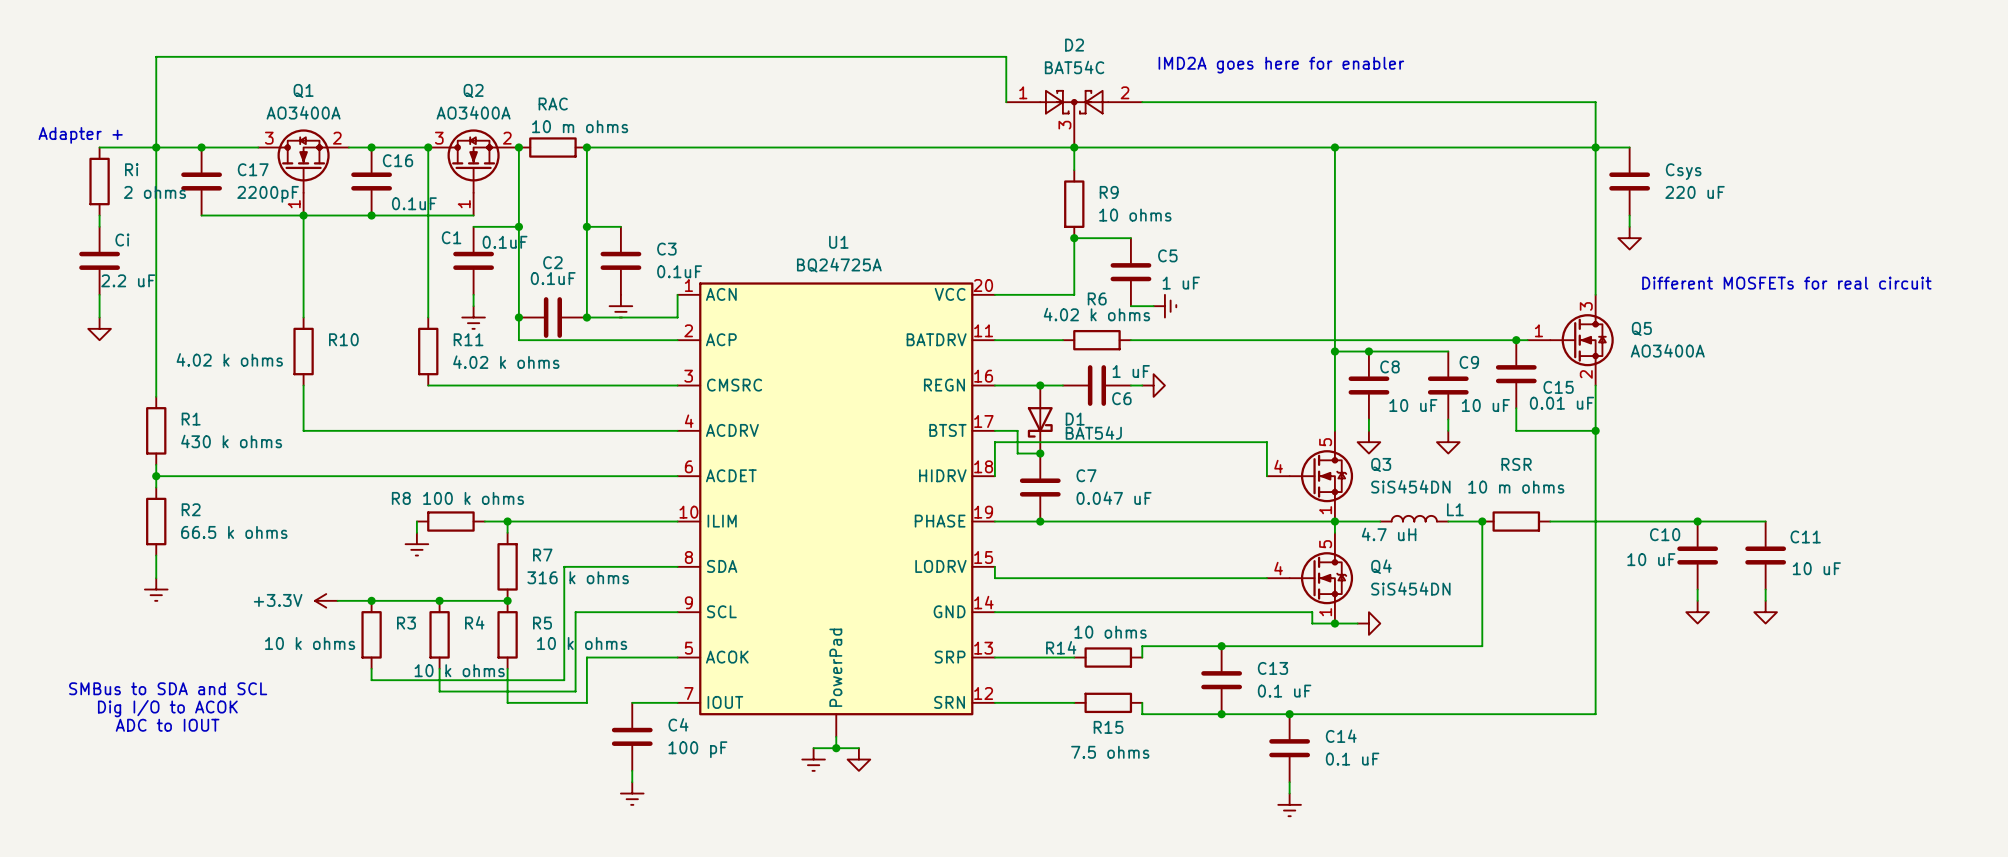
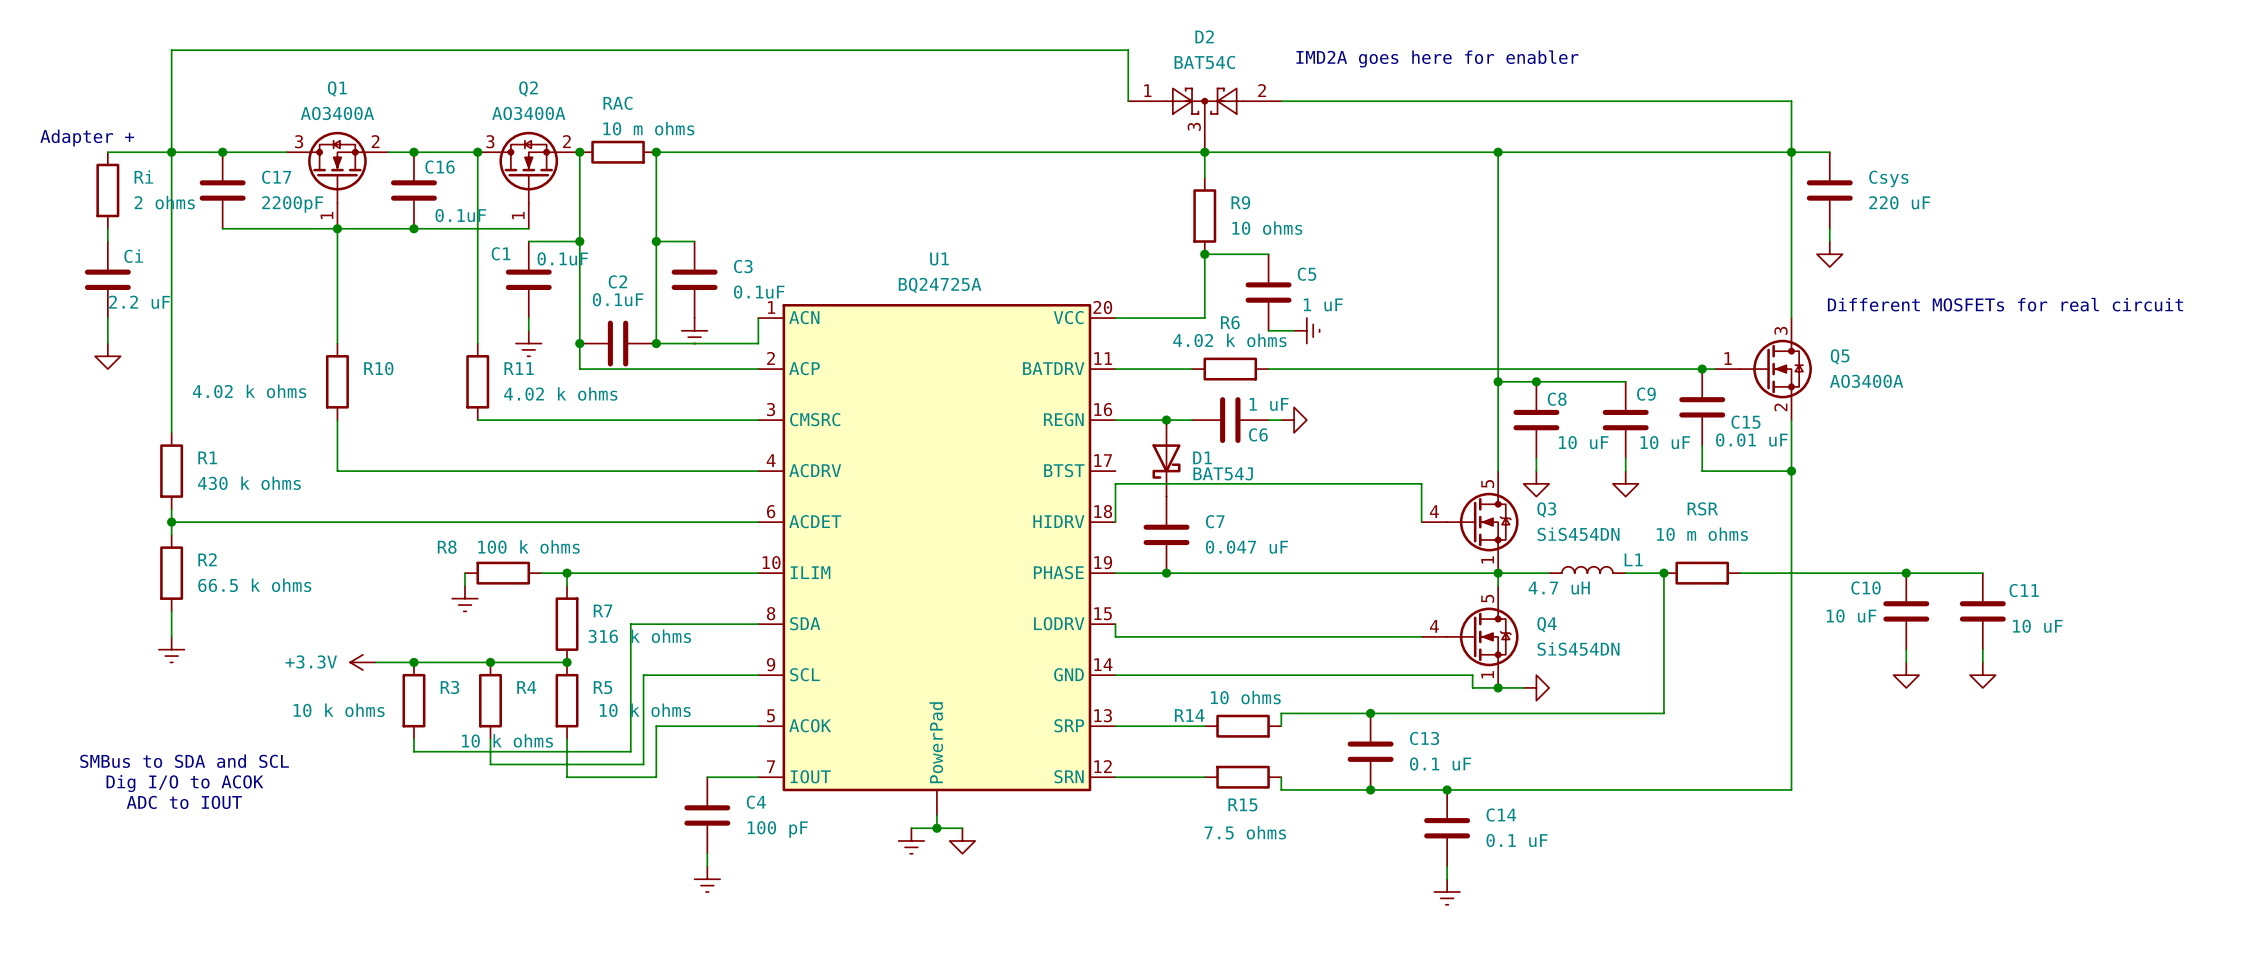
wire: (994, 430) (1017, 430) (1017, 453) (1040, 453) -> none
junction: (1040, 453) -> none

